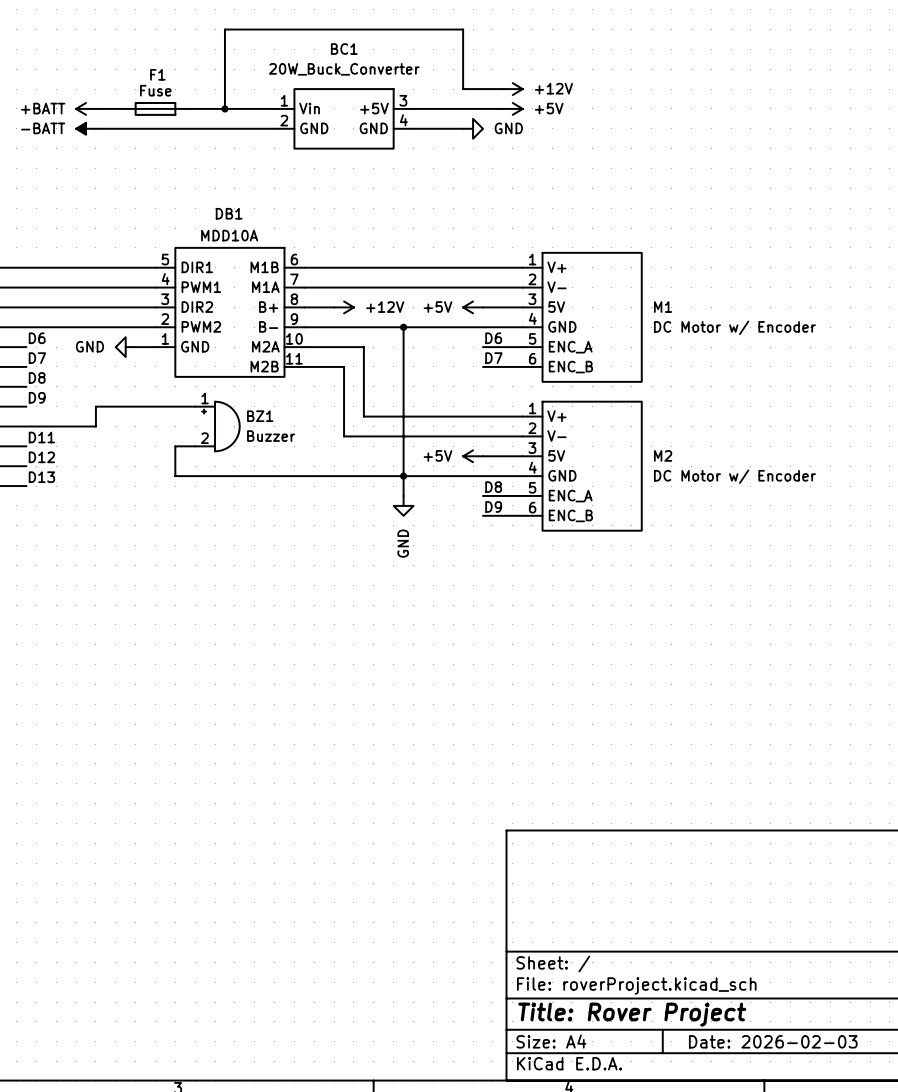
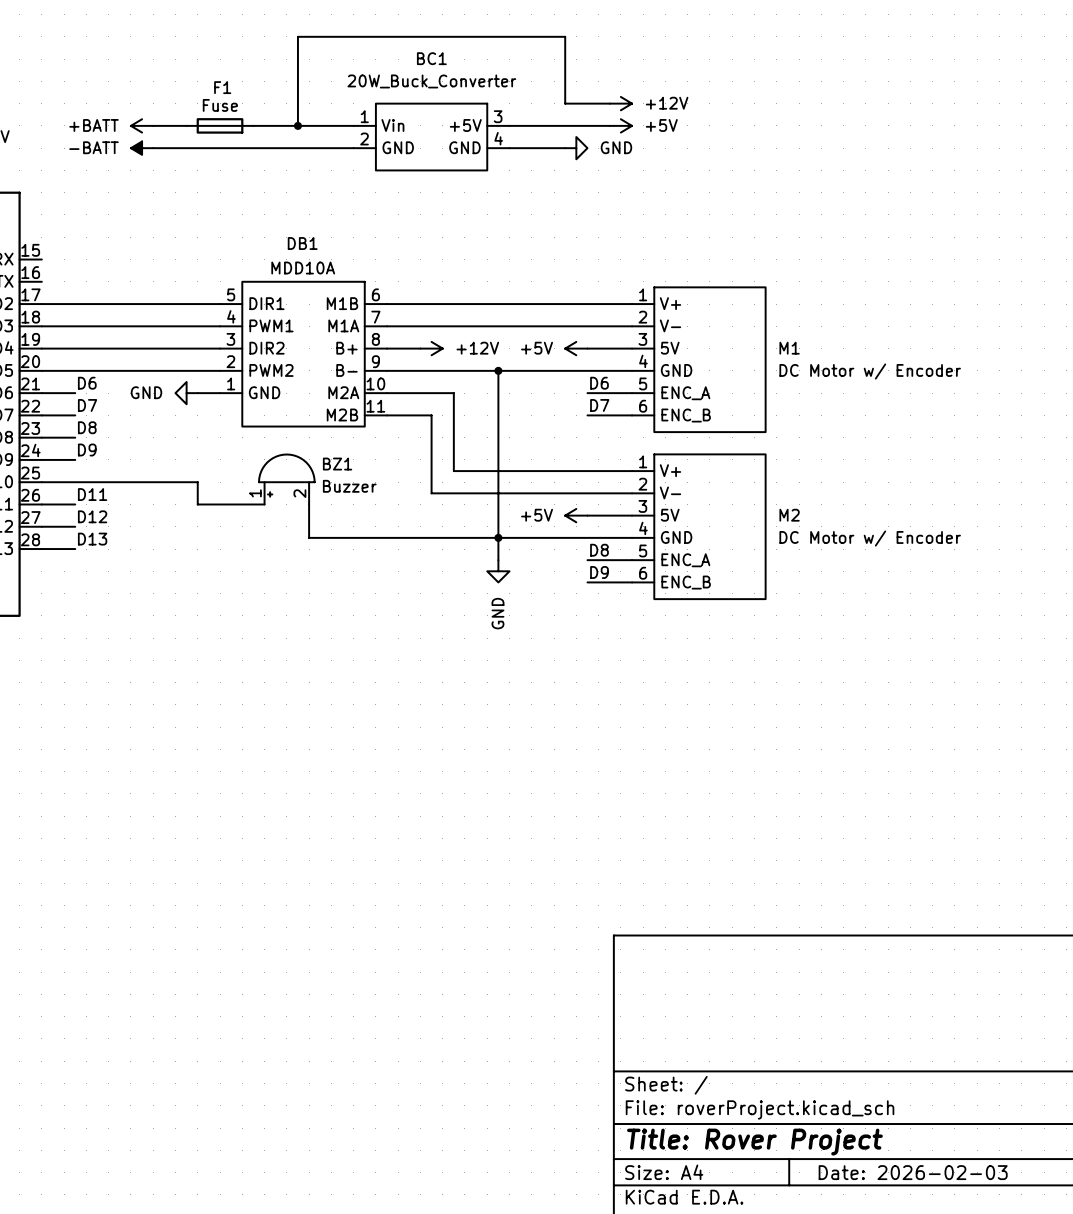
wire: (195, 406) (95, 406) (95, 426) -> (242, 504) (197, 504) (197, 482) (153, 482)
BZ1 rotation: 0° (220, 426) -> 90° counterclockwise (286, 475)
wire: (175, 446) (175, 476) (234, 476) -> (309, 504) (309, 537)

